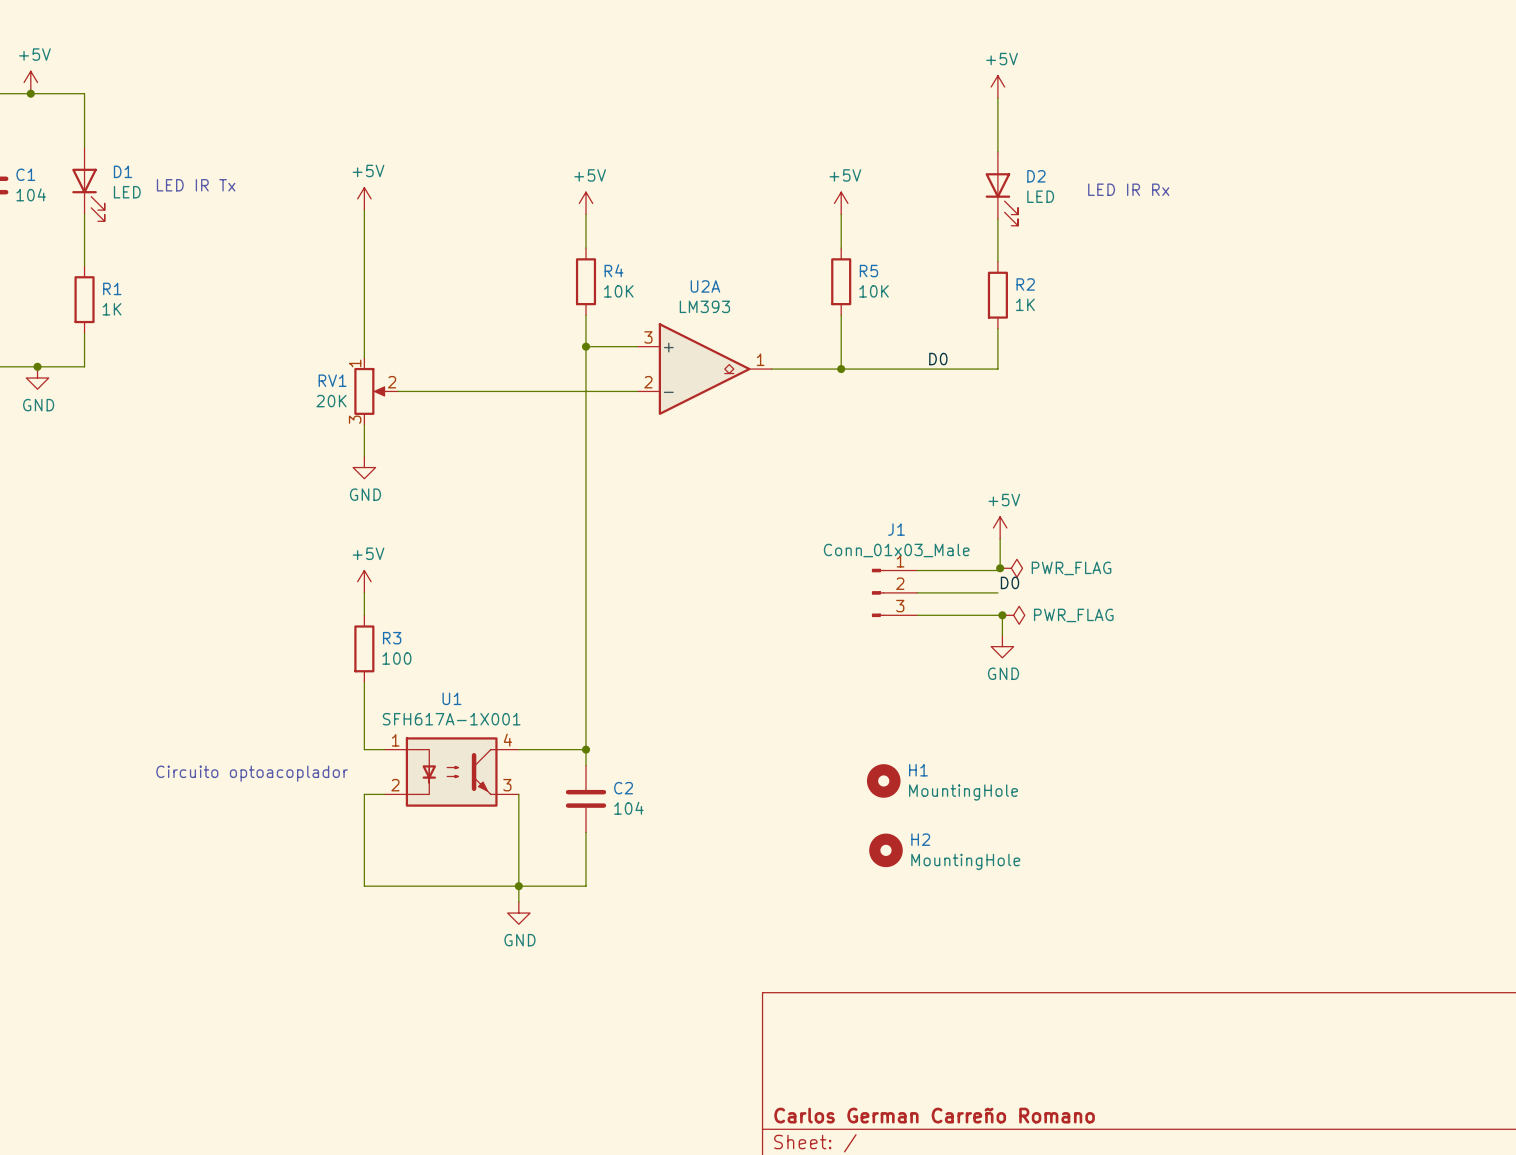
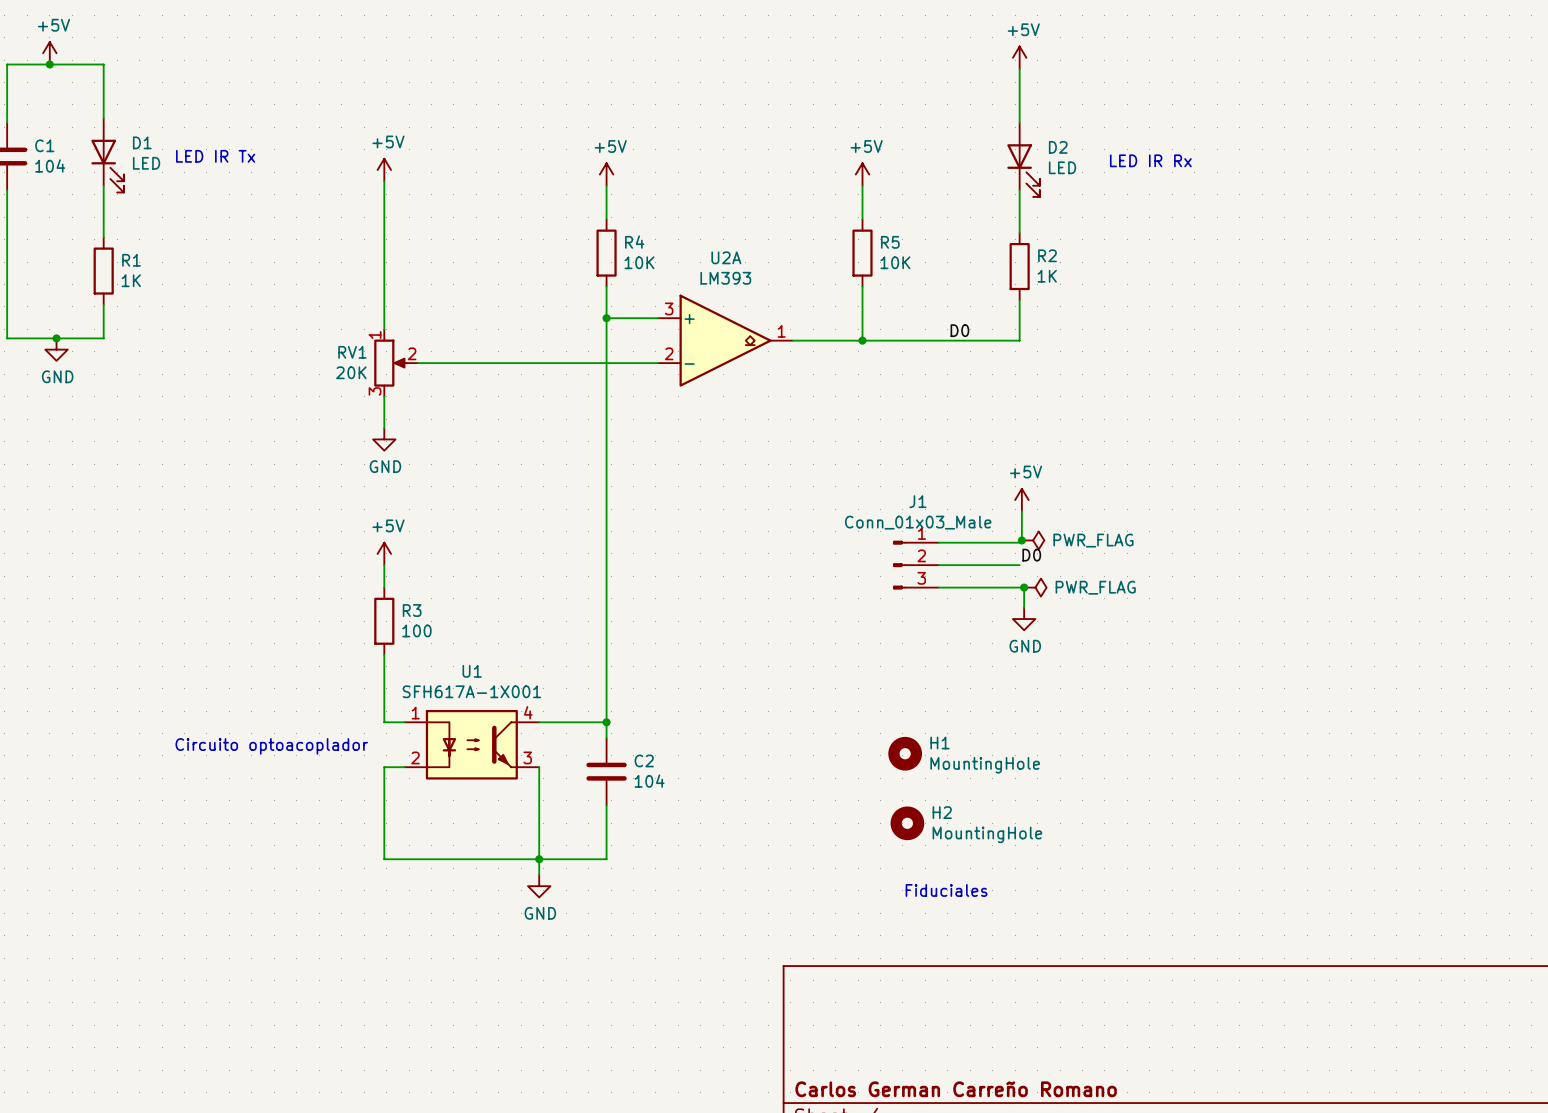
text: none -> Fiduciales (946, 890)

